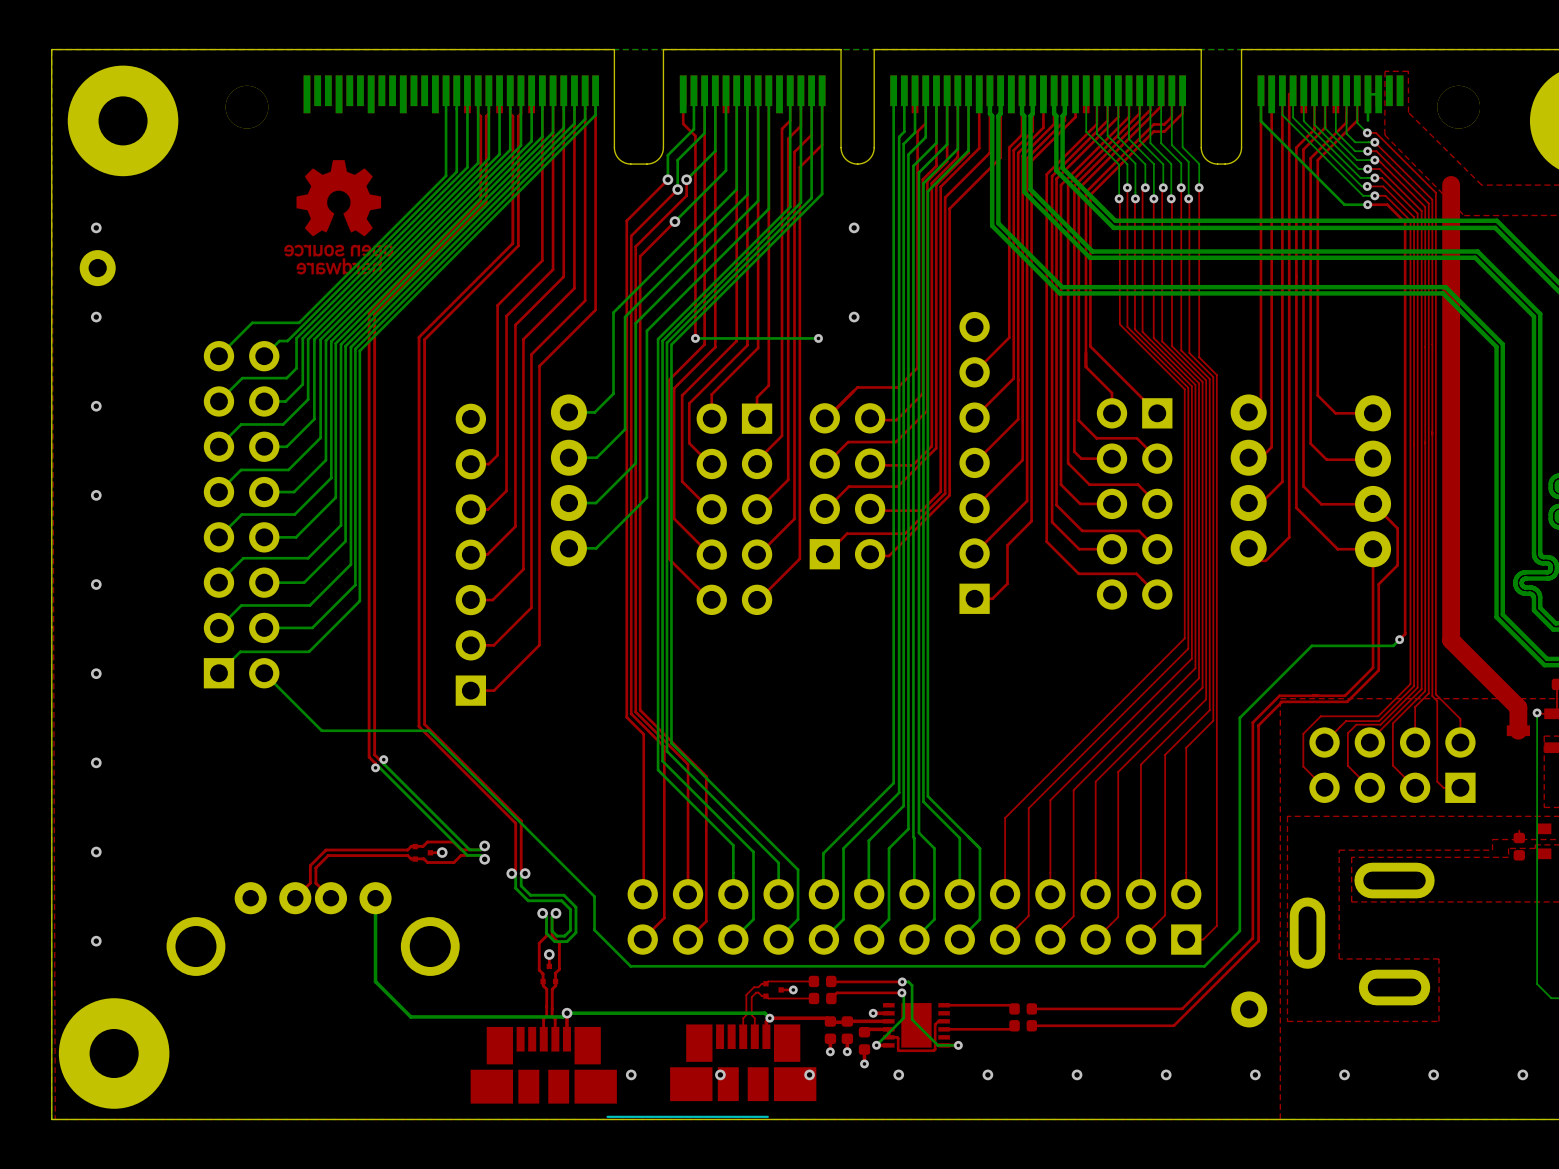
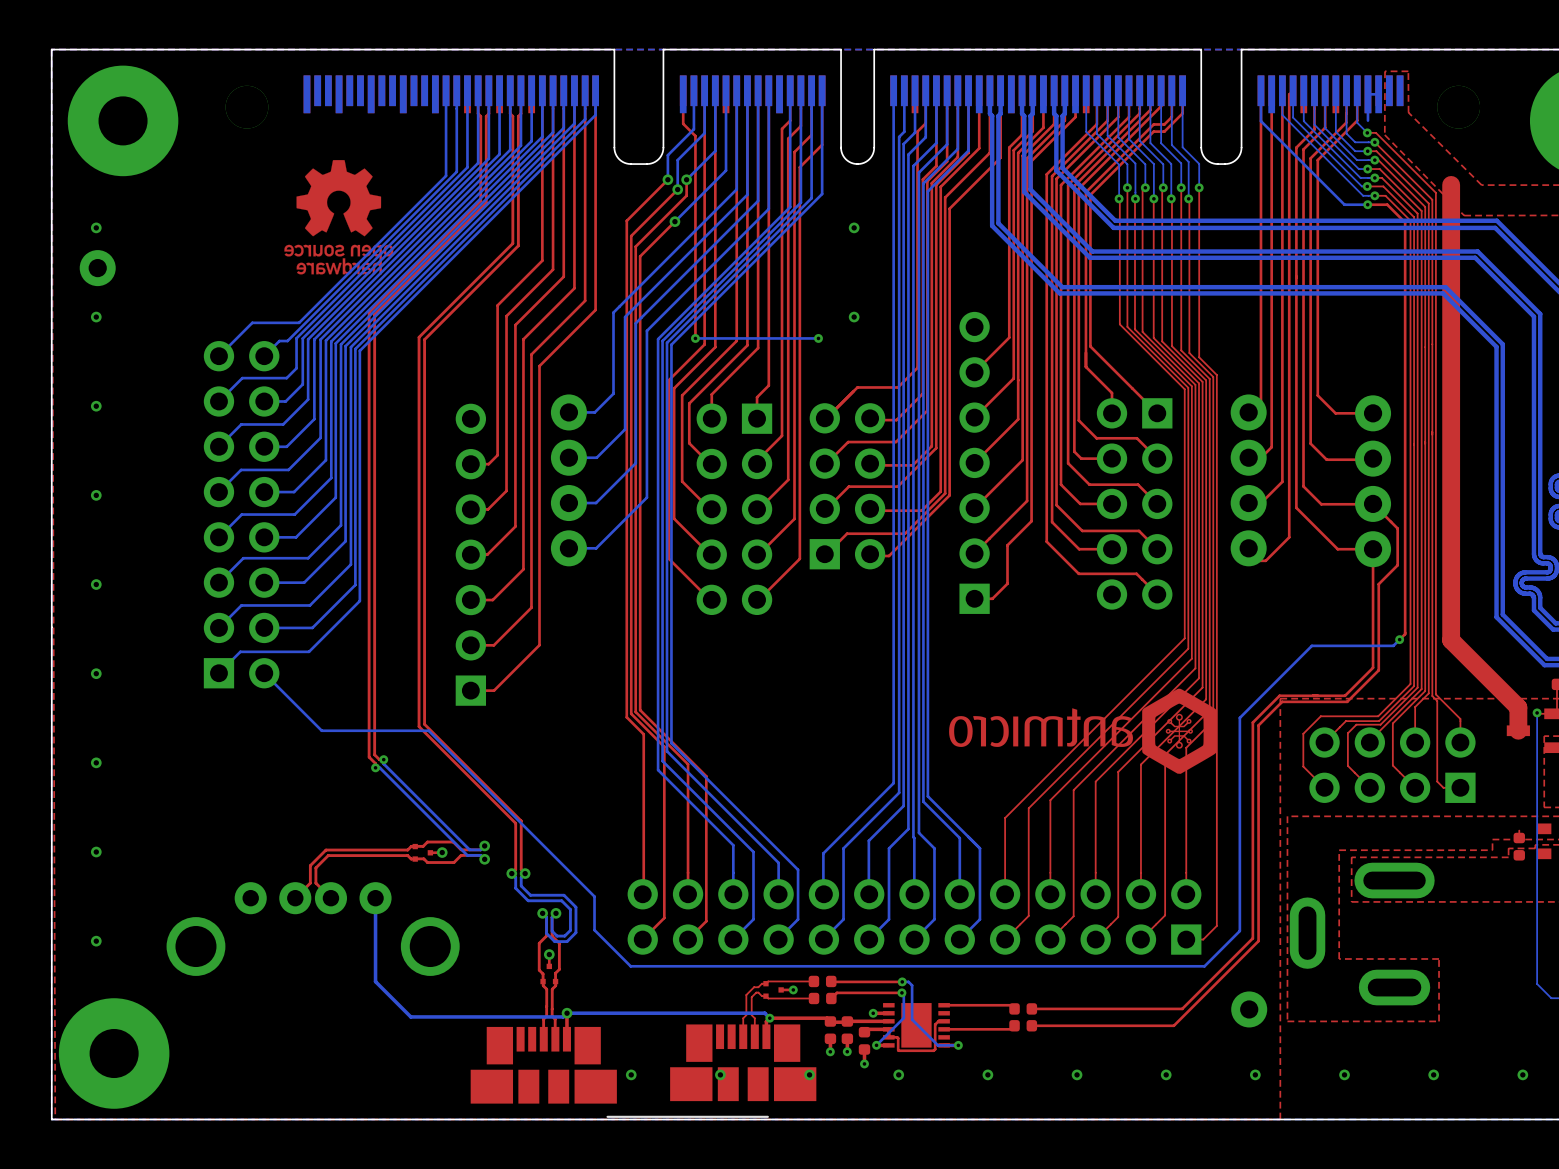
drawing: none -> [949, 688, 1217, 774]

